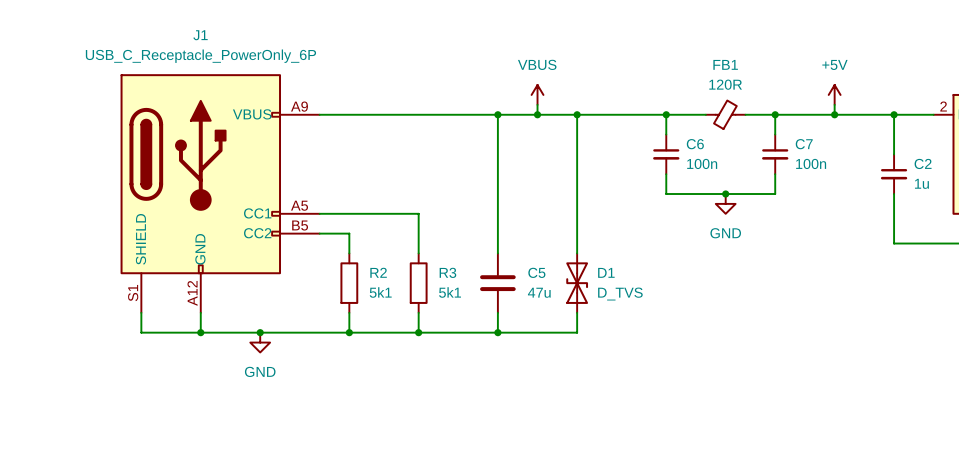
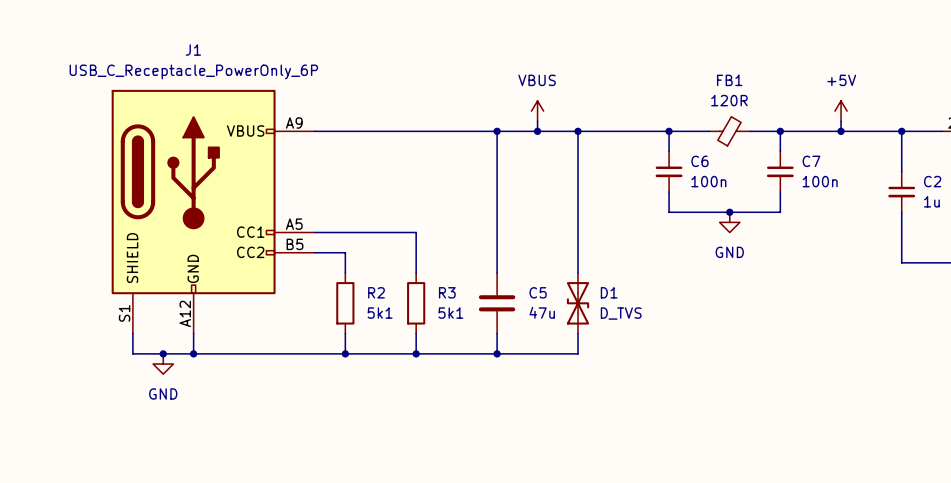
junction: none -> (163, 353)
junction: (260, 332) -> none
power symbol position: GND (260, 342) -> GND (163, 364)

